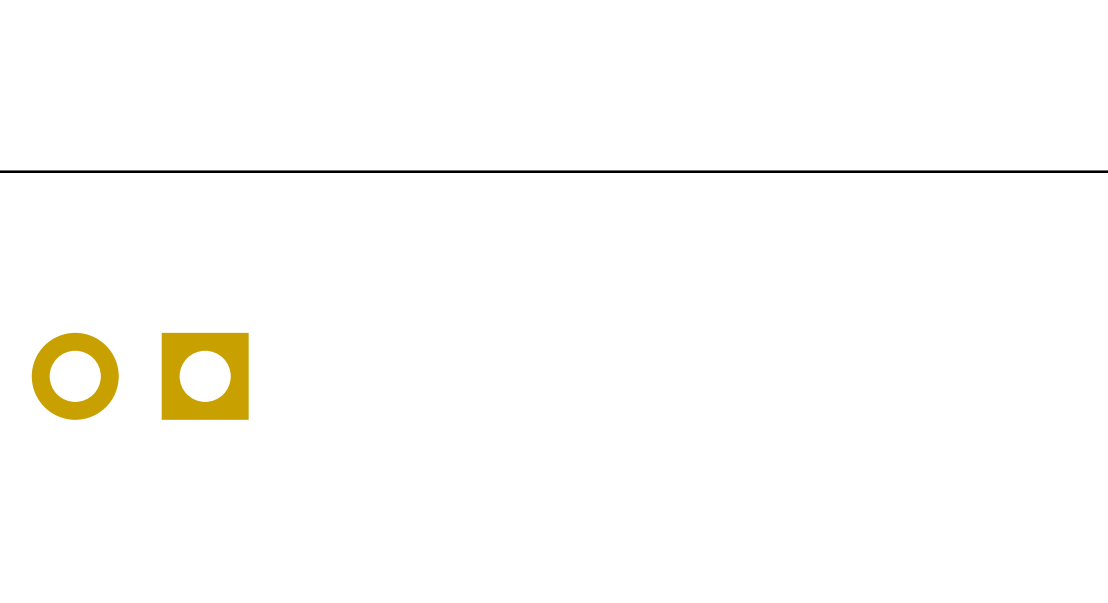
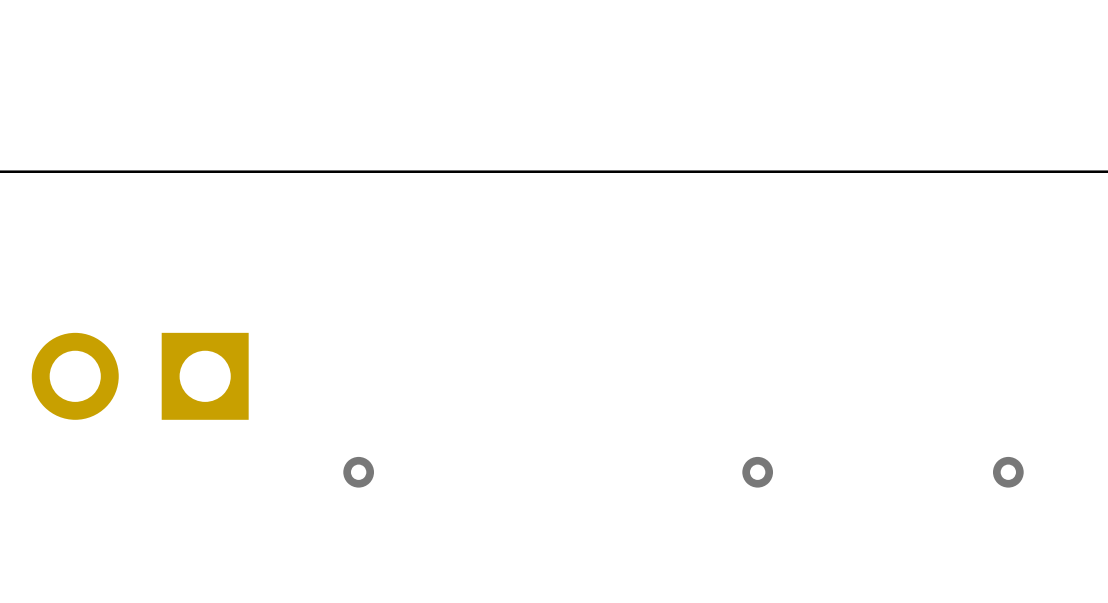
via: none -> (358, 472)
via: none -> (757, 472)
via: none -> (1008, 472)

